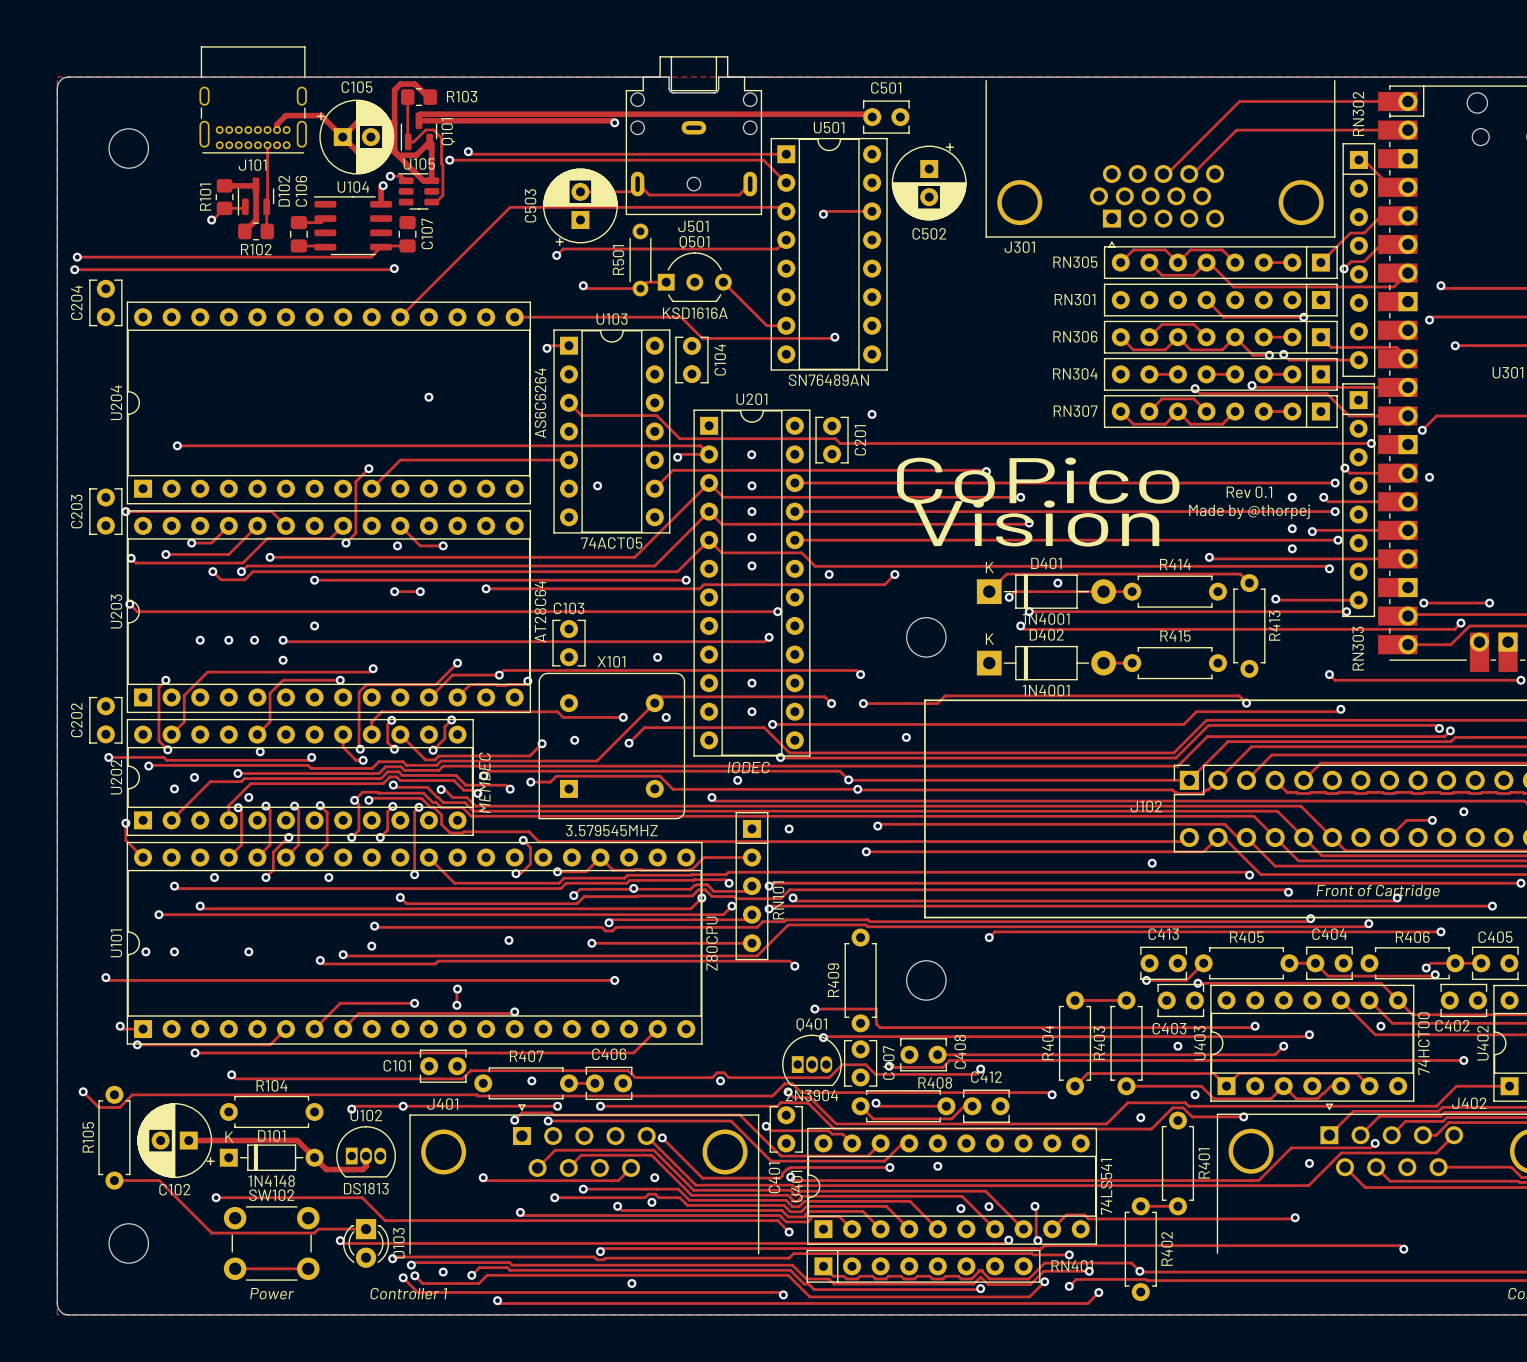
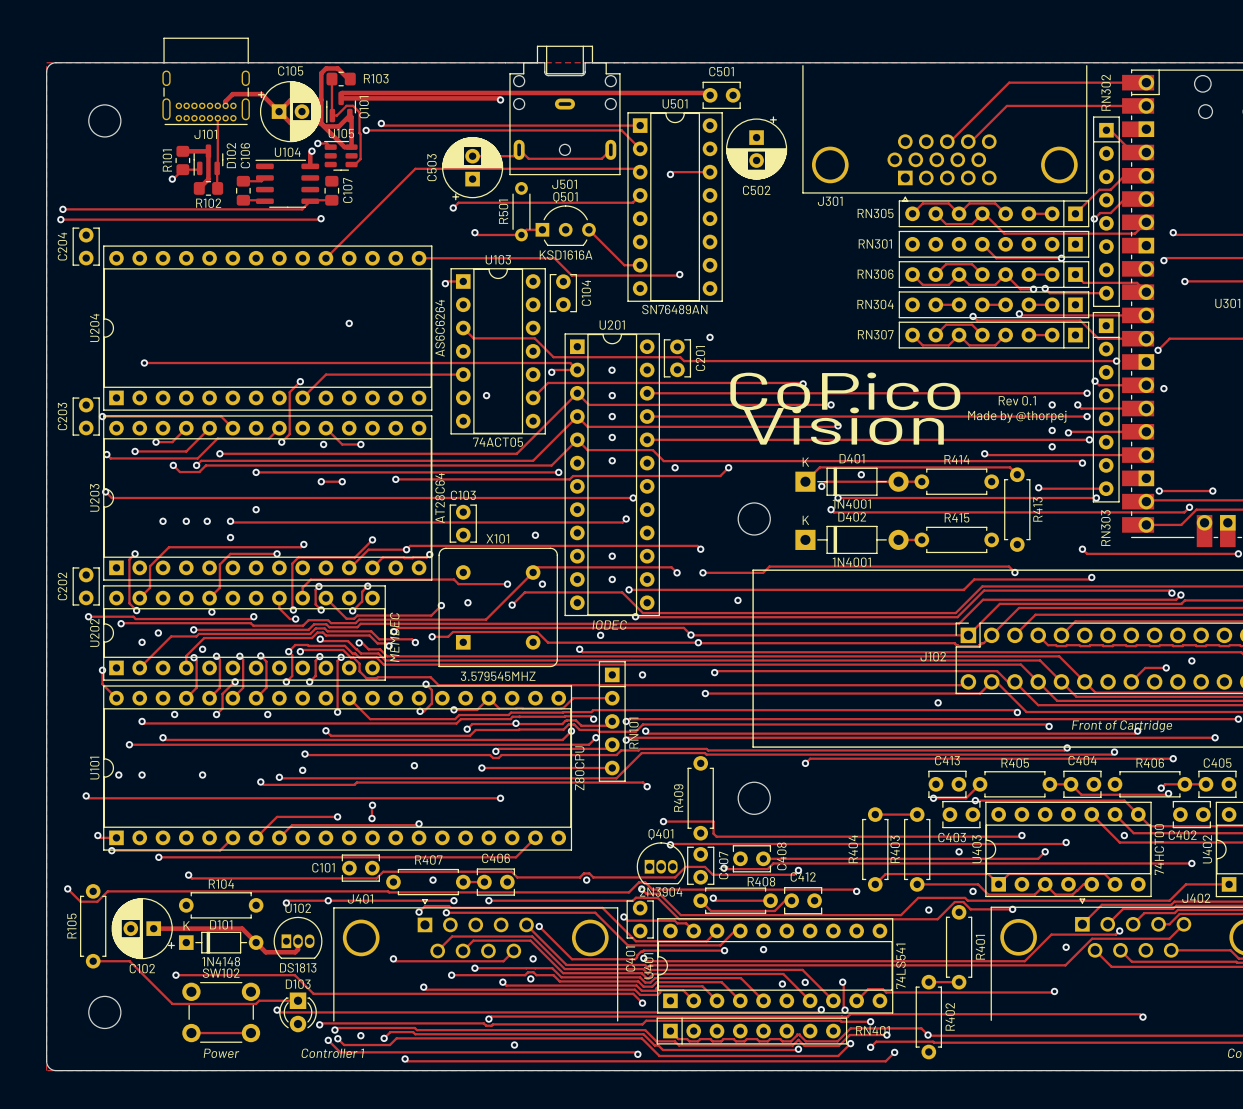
D103 name rotation: 0° (398, 1243) -> 90° clockwise (298, 984)

